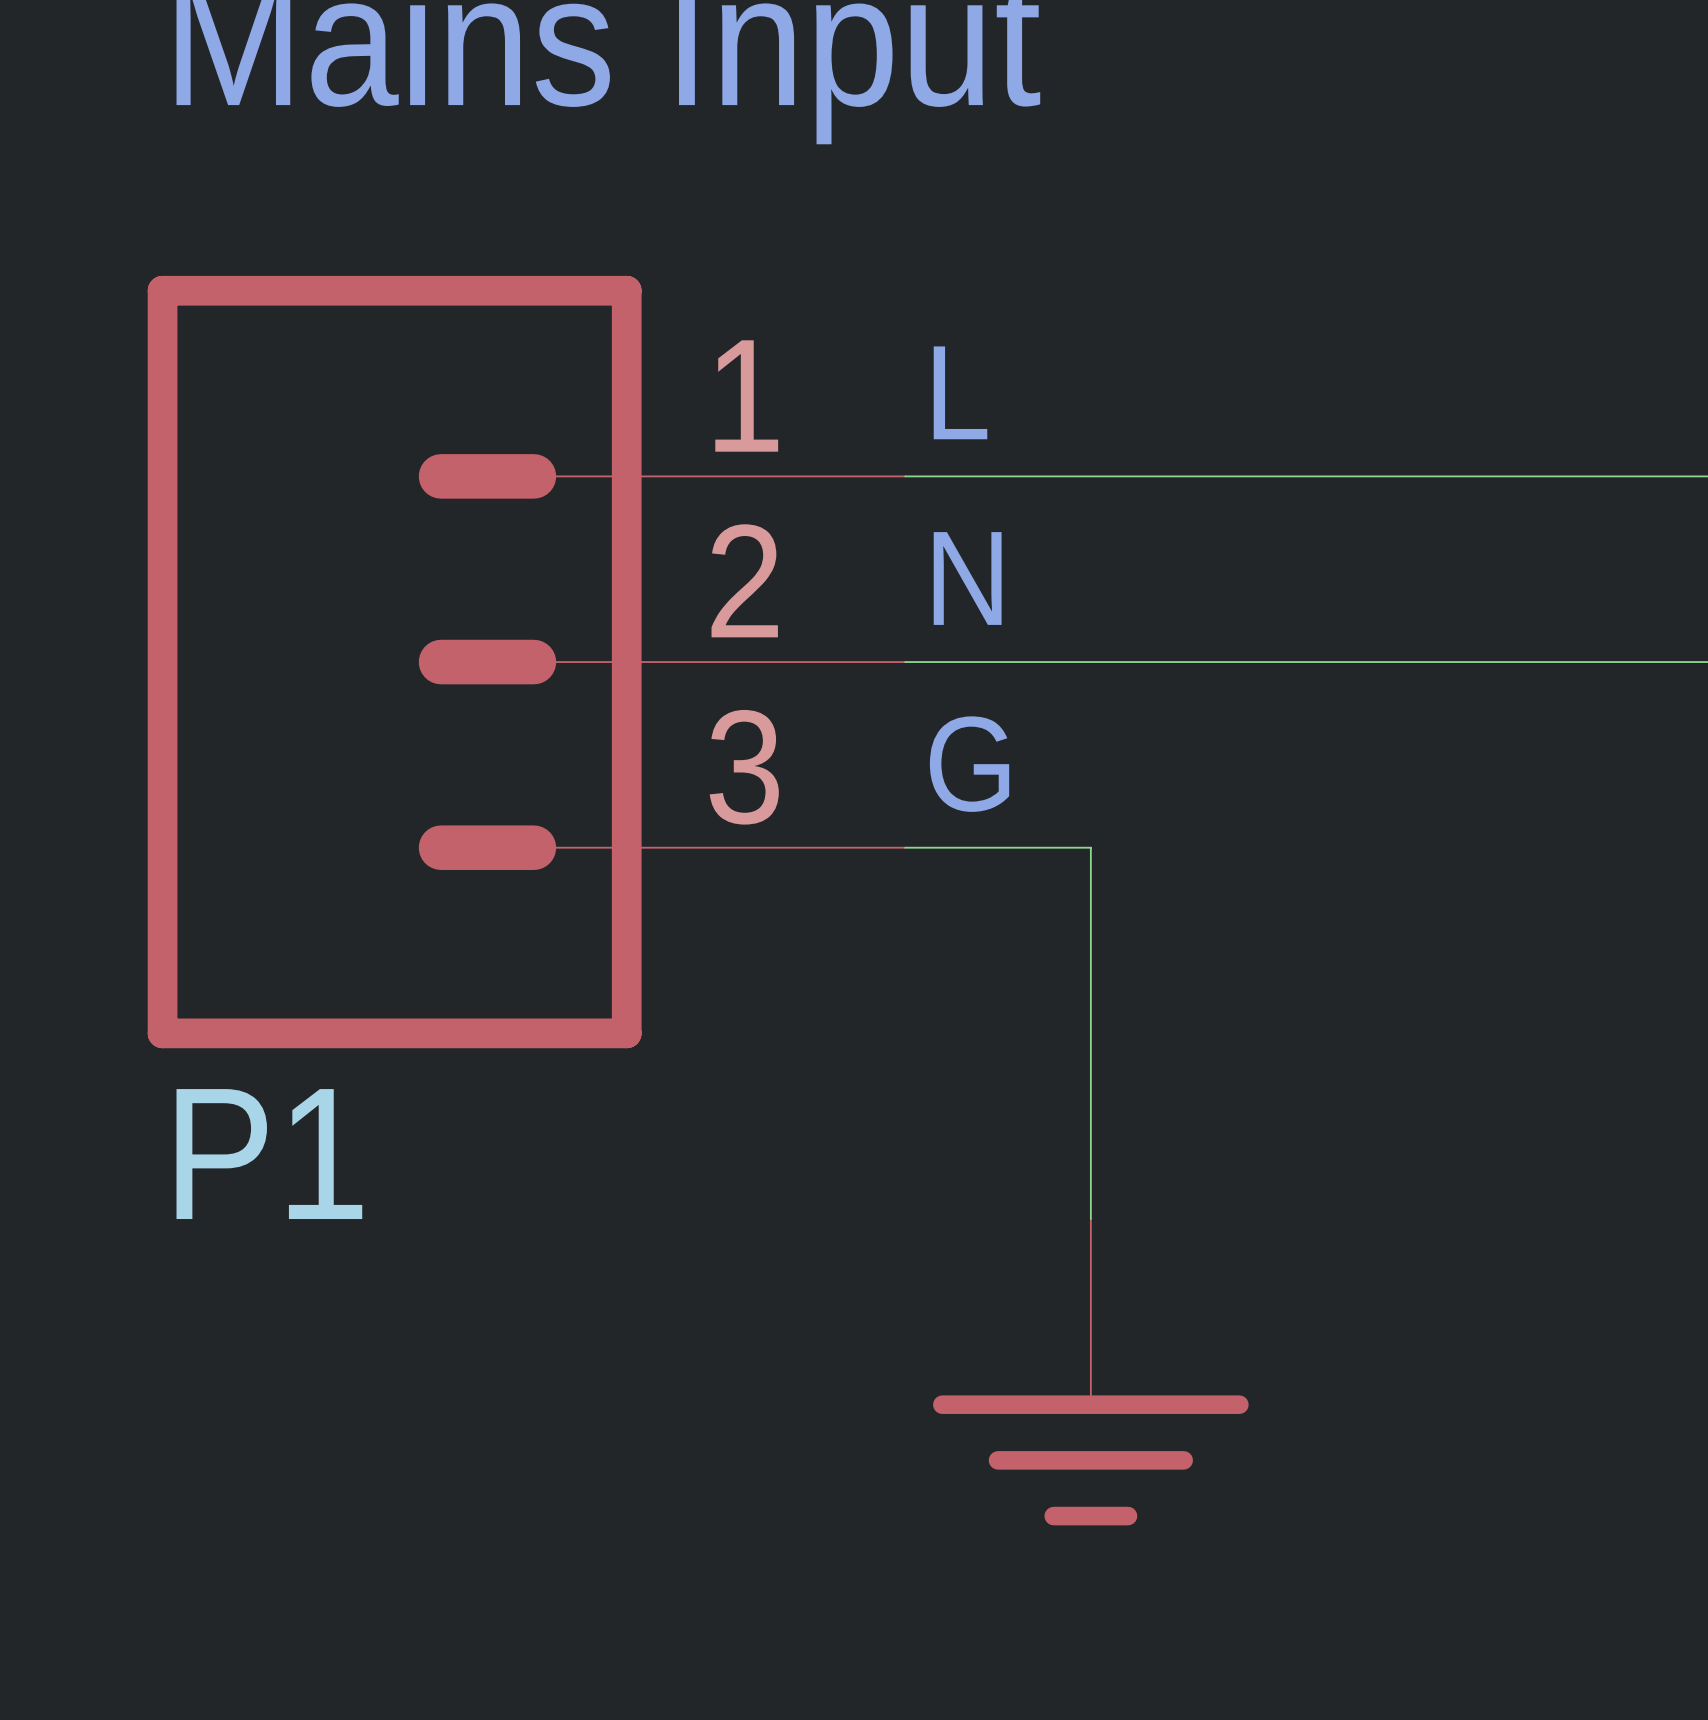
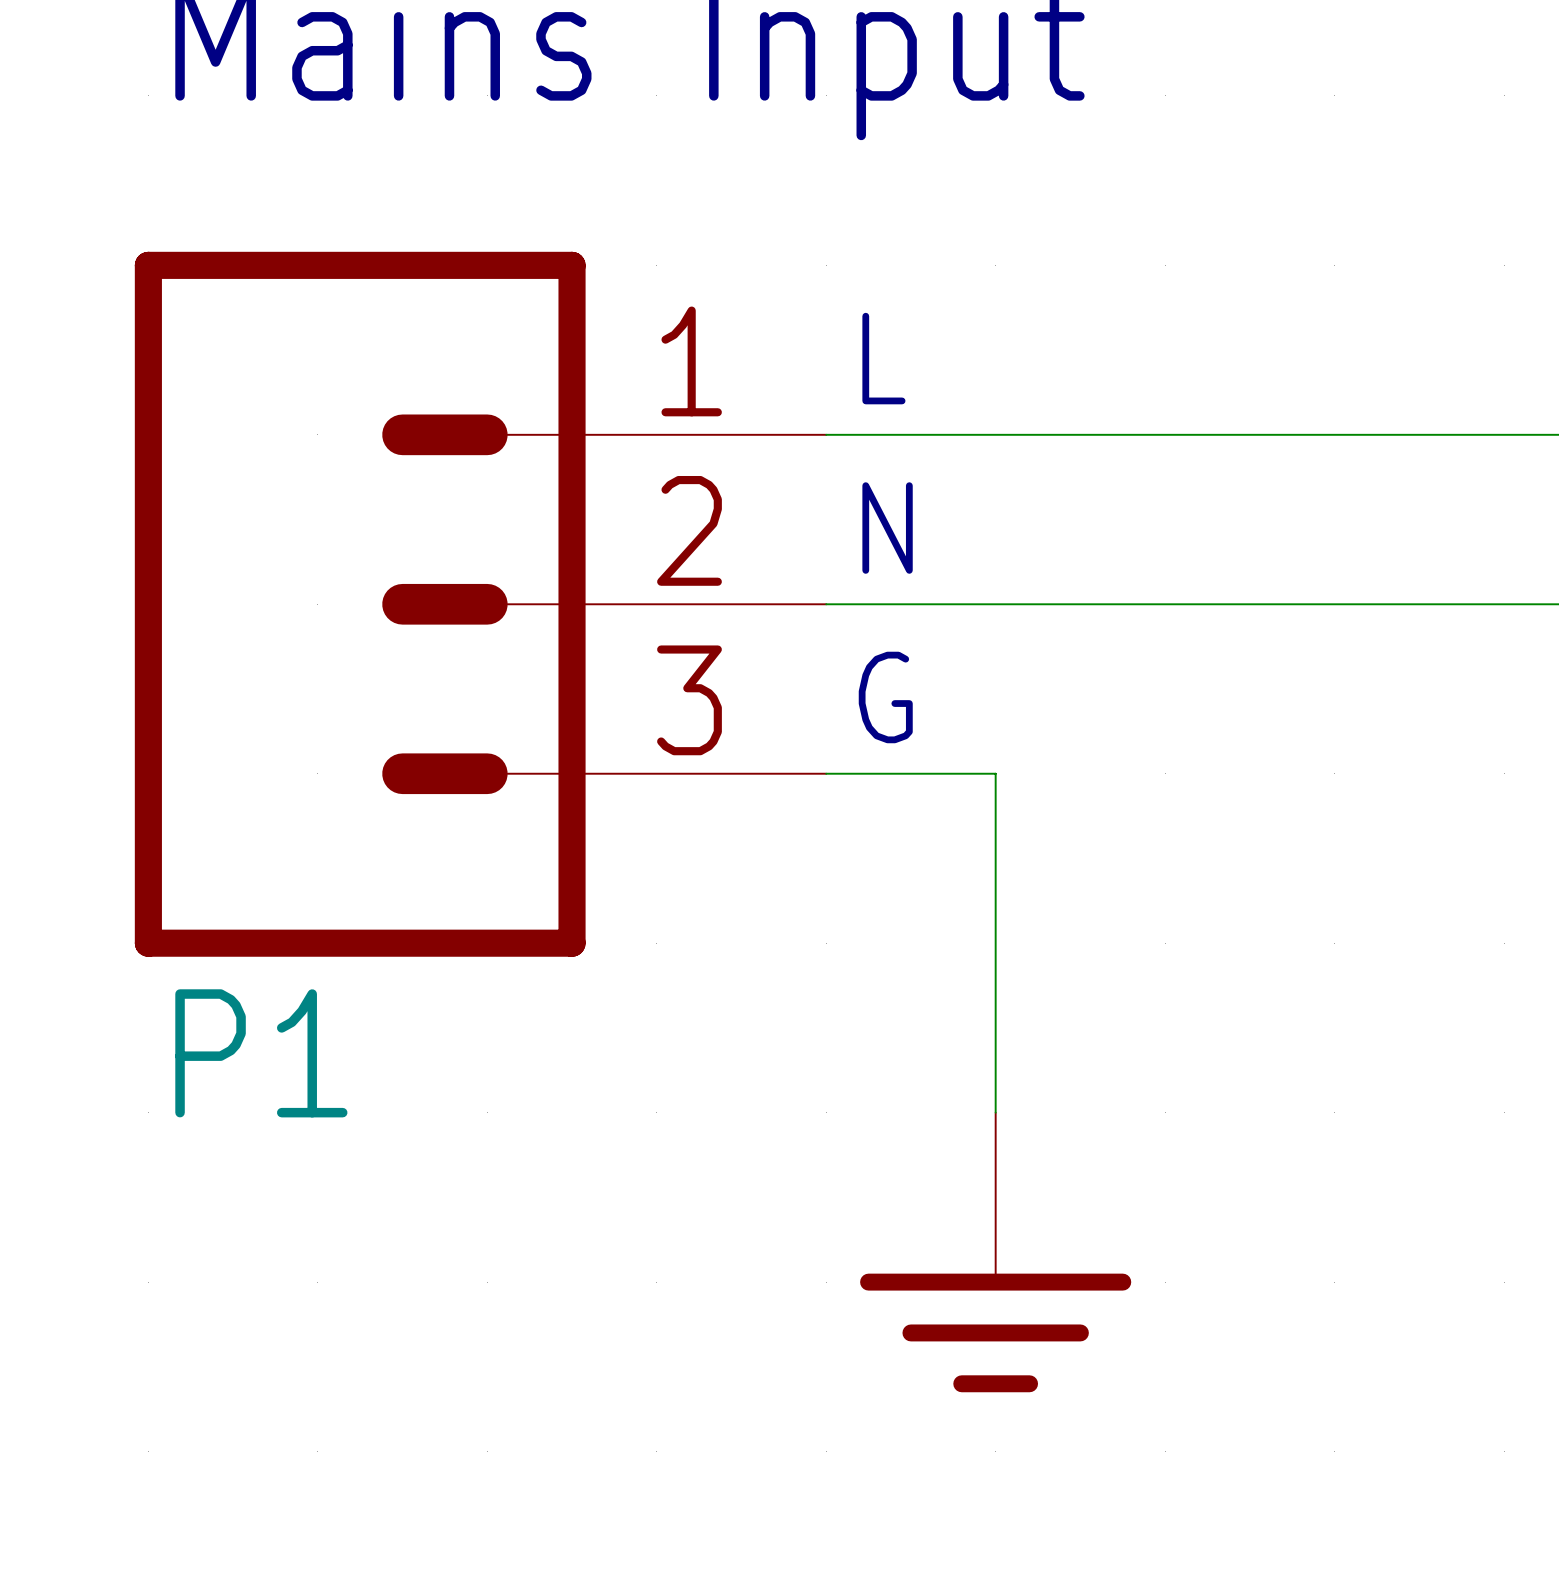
power symbol shape: [933, 1219, 1249, 1526] -> [860, 1112, 1132, 1393]

